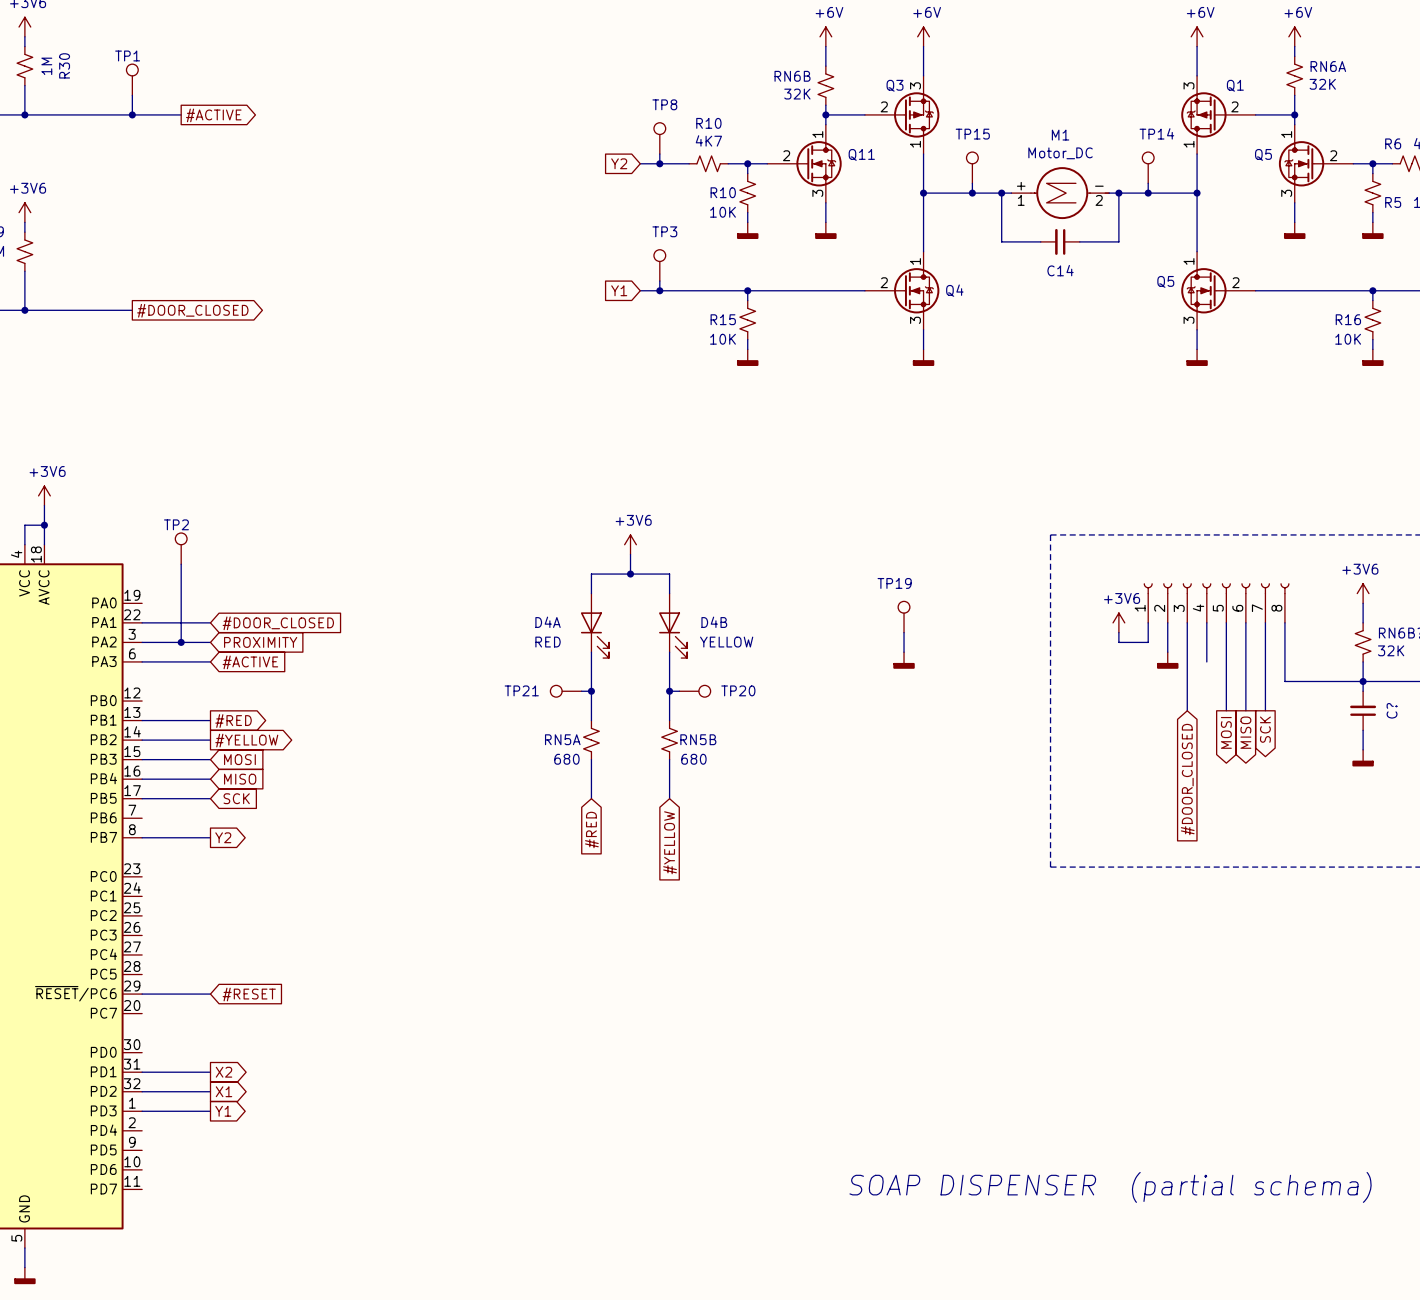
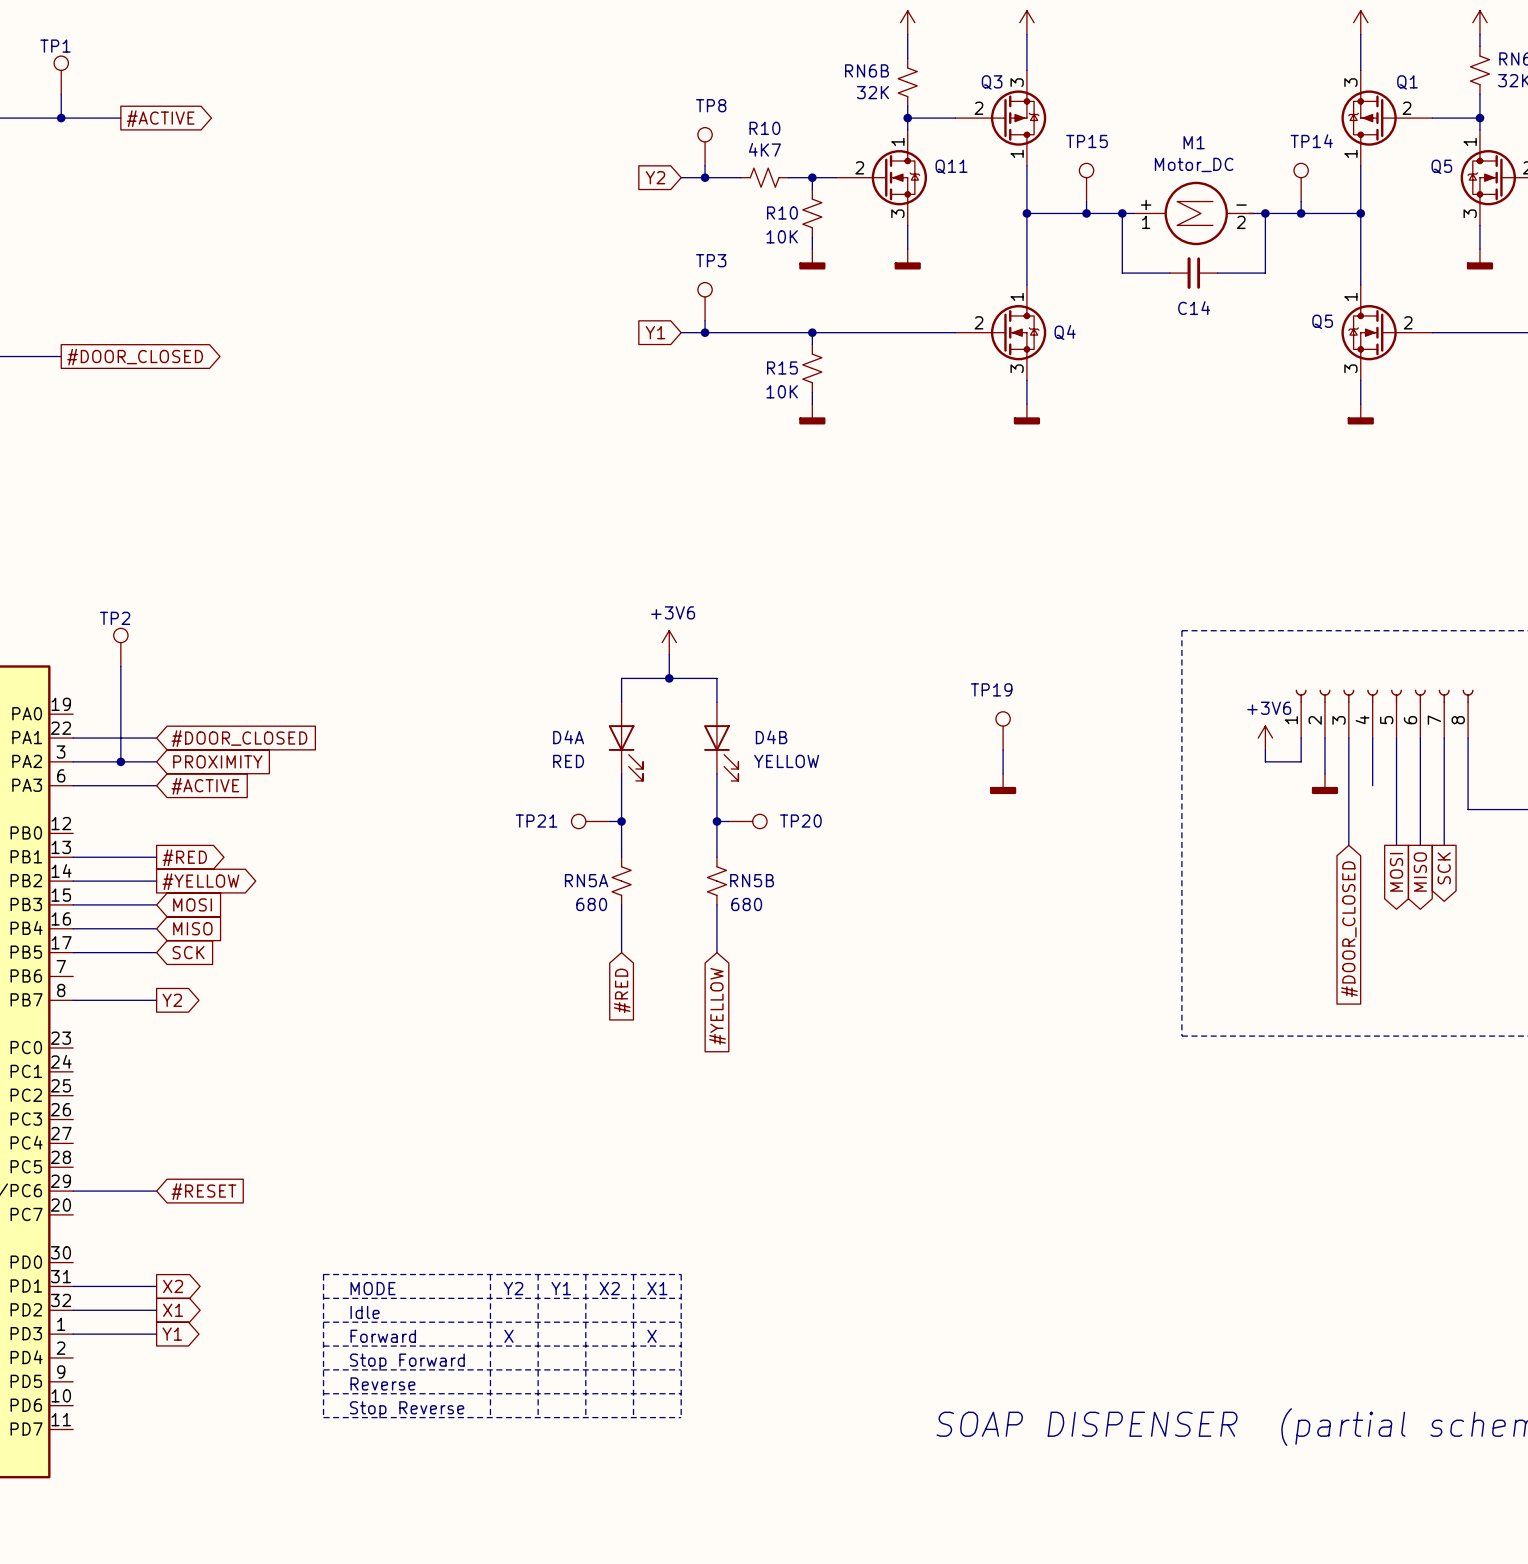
line: none -> (323, 1274) (323, 1417) (681, 1417) (681, 1274) (323, 1274)
line: none -> (490, 1274) (490, 1417)
line: none -> (538, 1274) (538, 1417)
line: none -> (585, 1274) (585, 1417)
line: none -> (633, 1274) (633, 1417)
text: none -> MODE (373, 1288)
text: none -> Y2 (513, 1288)
text: none -> Y1 (561, 1288)
text: none -> X2 (609, 1288)
text: none -> X1 (657, 1288)
line: none -> (323, 1298) (681, 1298)
text: none -> Idle (365, 1312)
line: none -> (323, 1322) (681, 1322)
text: none -> Forward (383, 1336)
text: none -> X (508, 1336)
text: none -> X (652, 1336)
line: none -> (323, 1346) (681, 1346)
text: none -> Stop Forward (407, 1362)
line: none -> (323, 1369) (681, 1369)
text: none -> Reverse (382, 1383)
line: none -> (323, 1393) (681, 1393)
text: none -> Stop Reverse (407, 1409)

